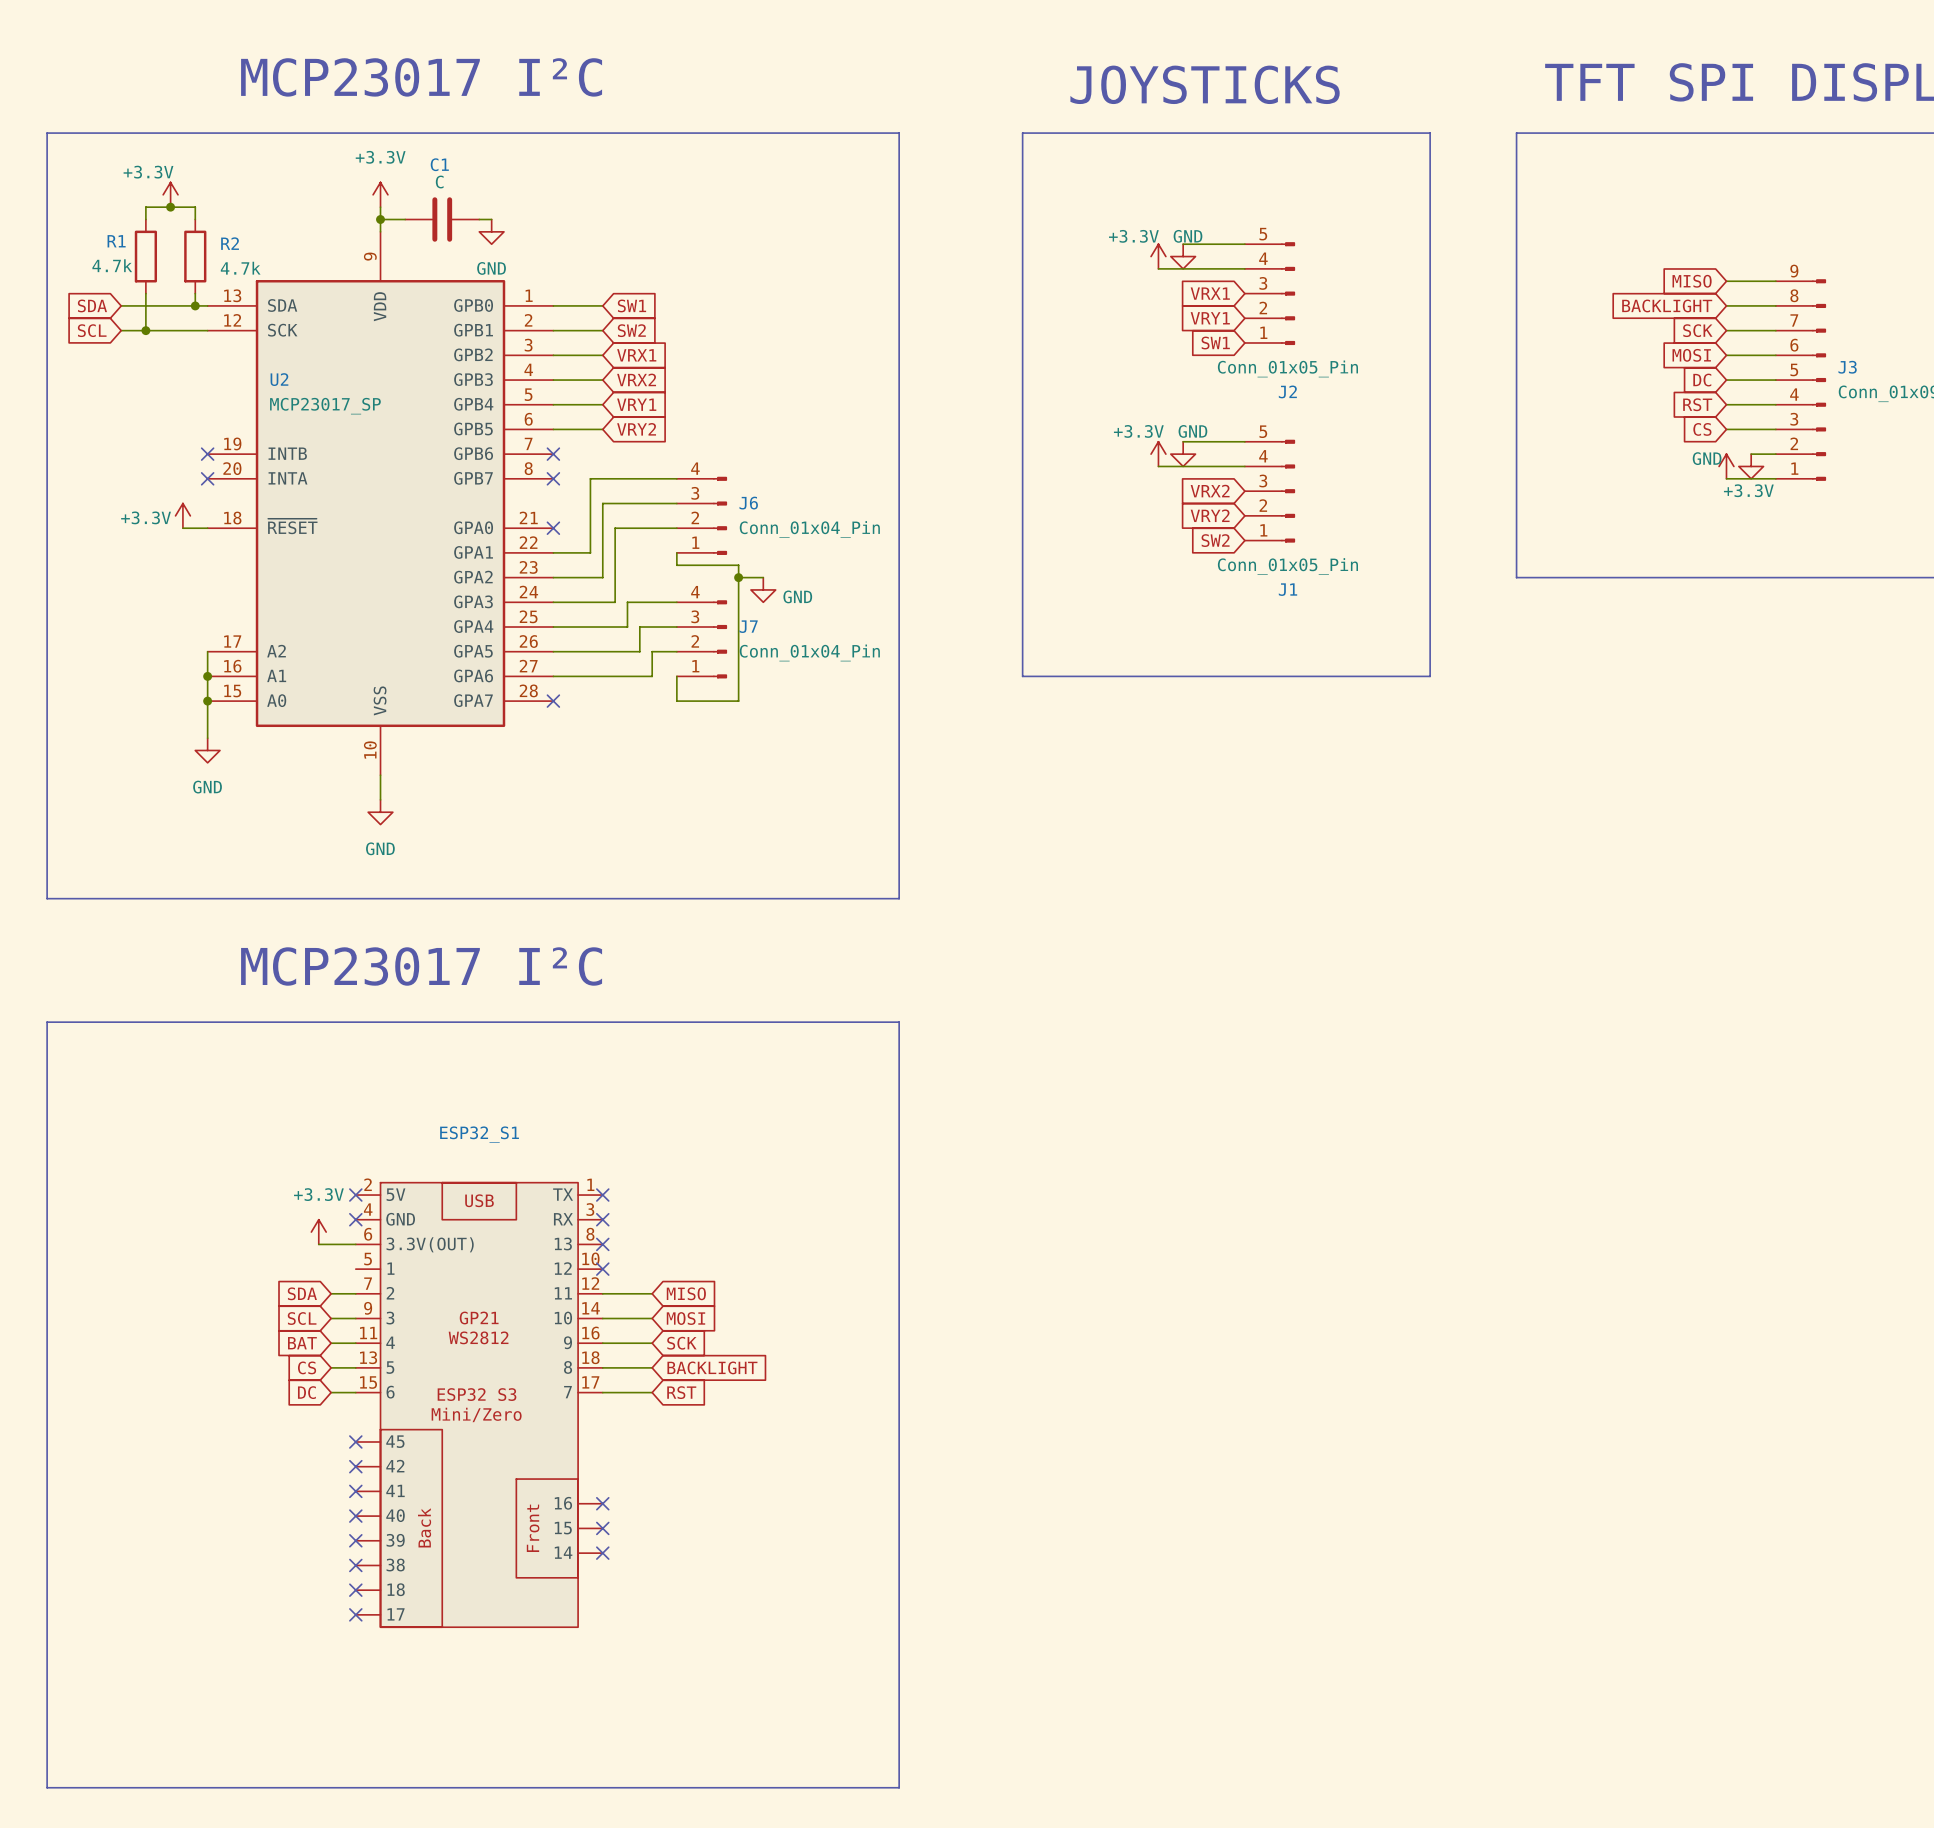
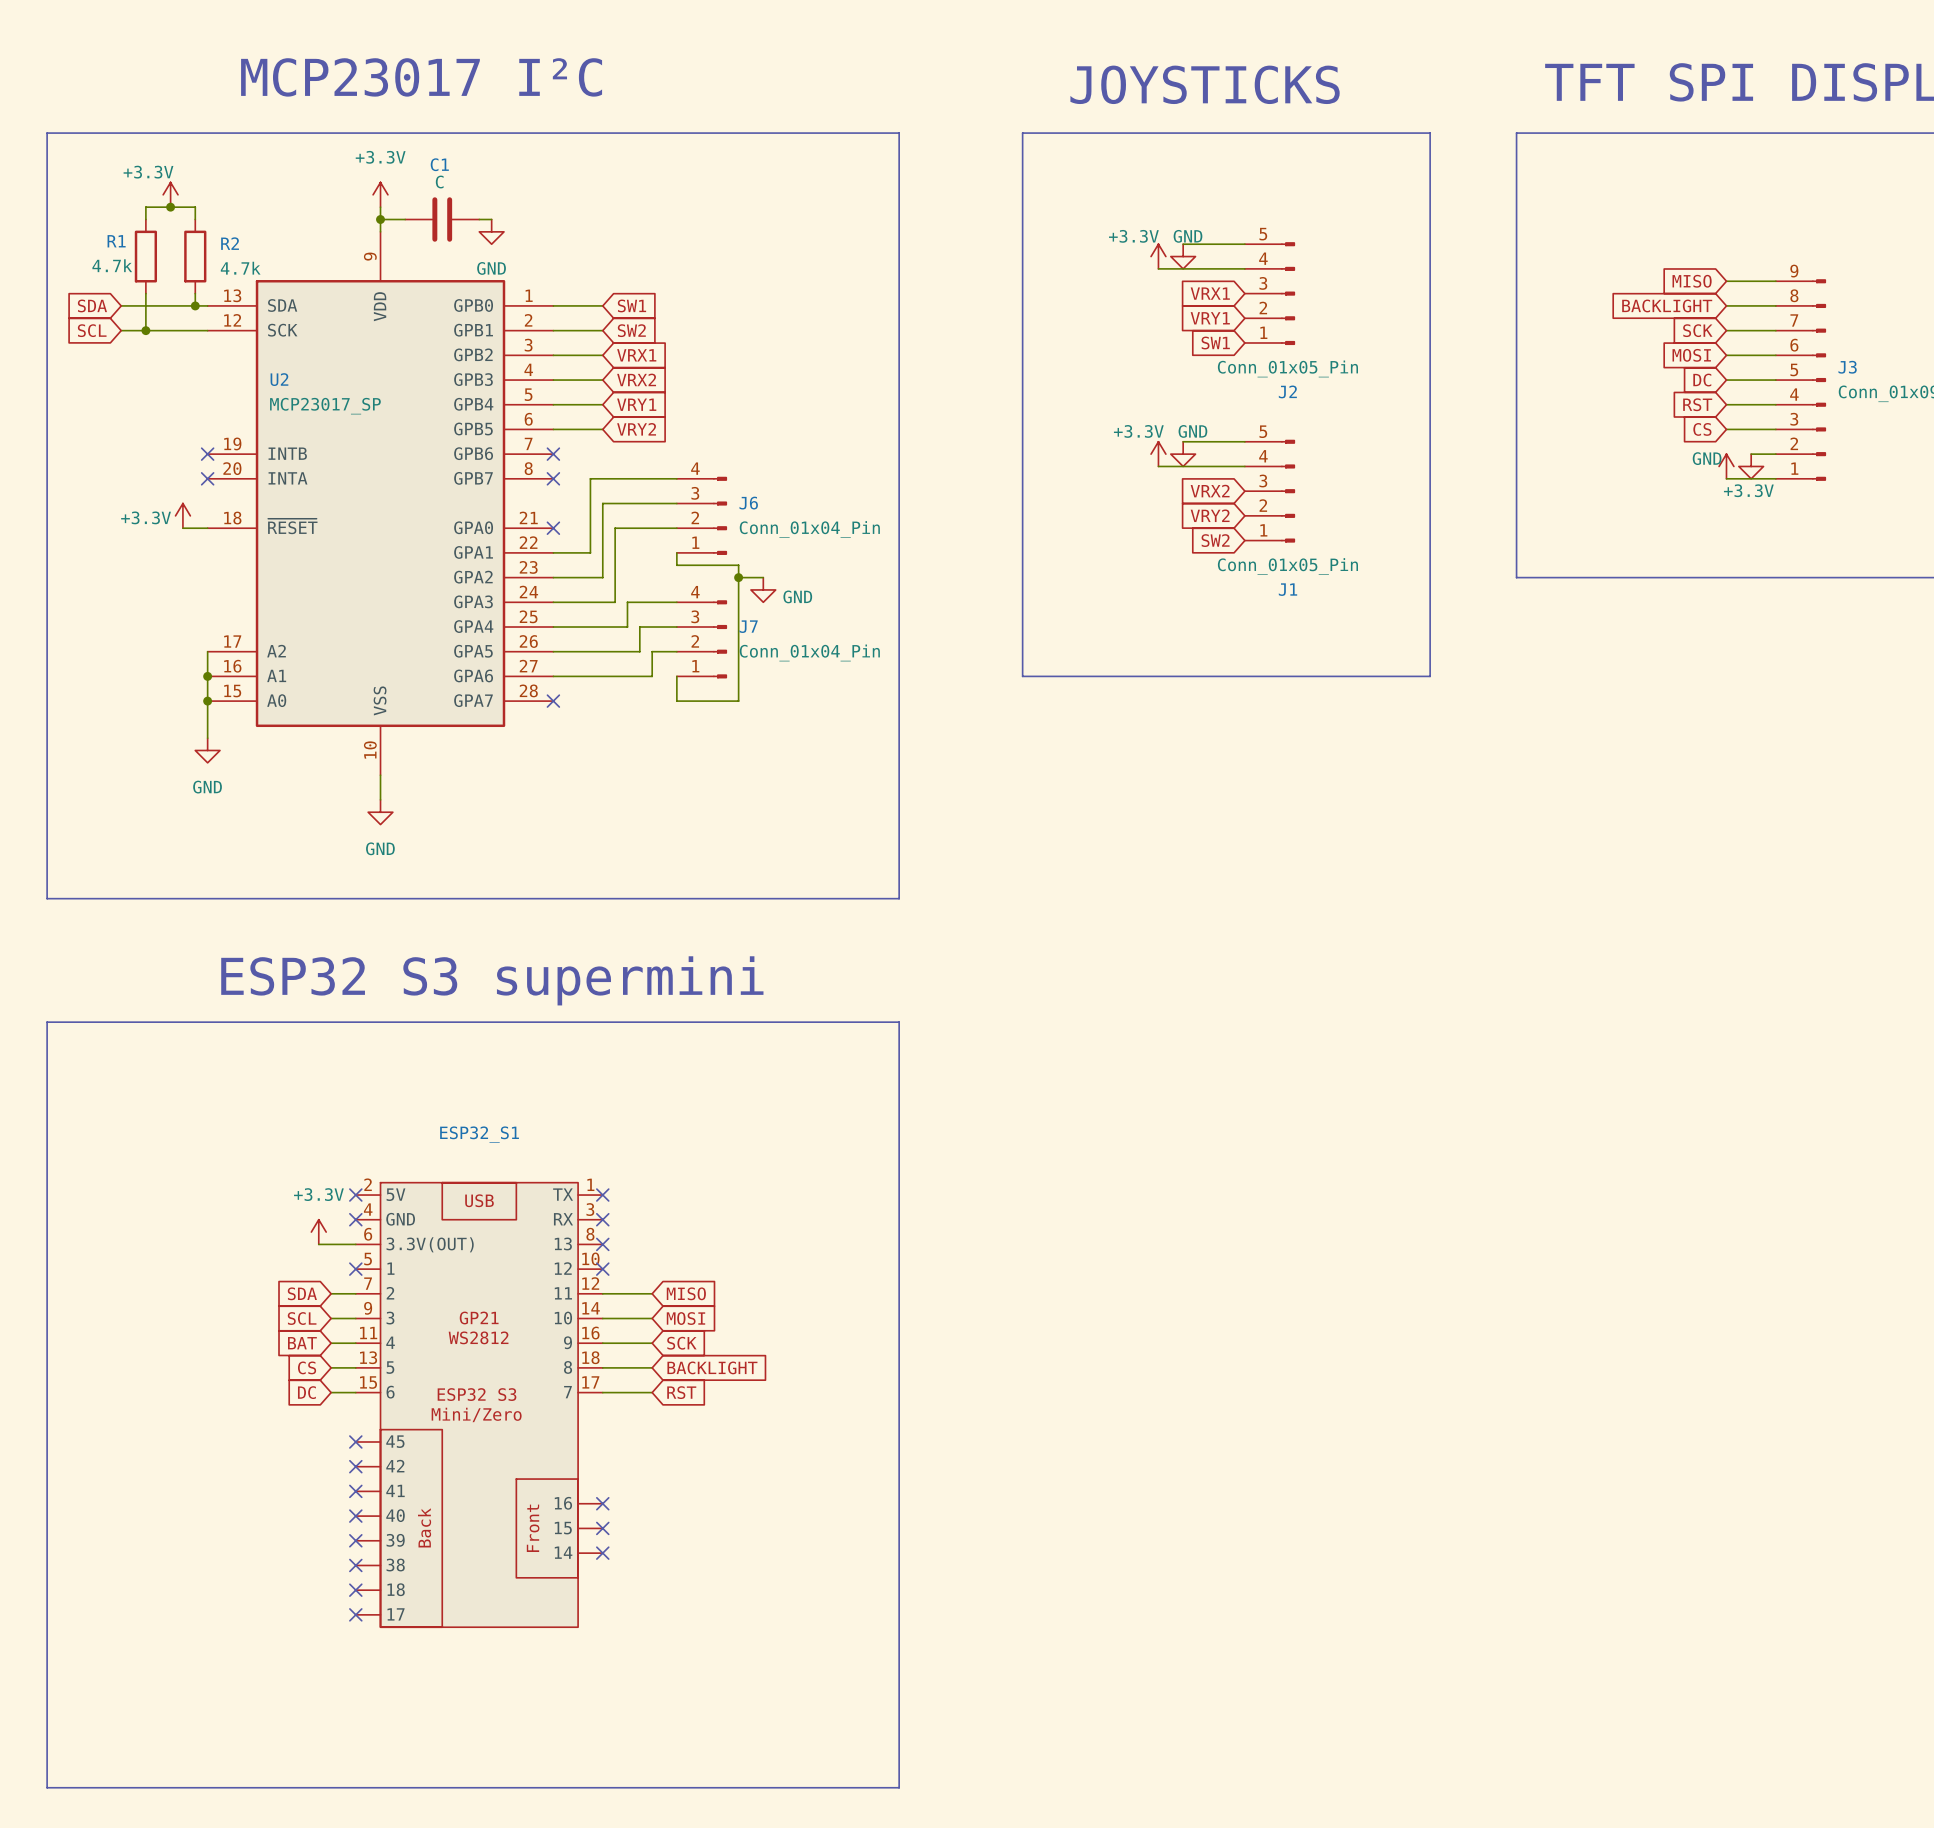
text: MCP23017 I²C (421, 966) -> none
text: none -> ESP32 S3 supermini (492, 980)
no-connect mark: none -> (355, 1269)

